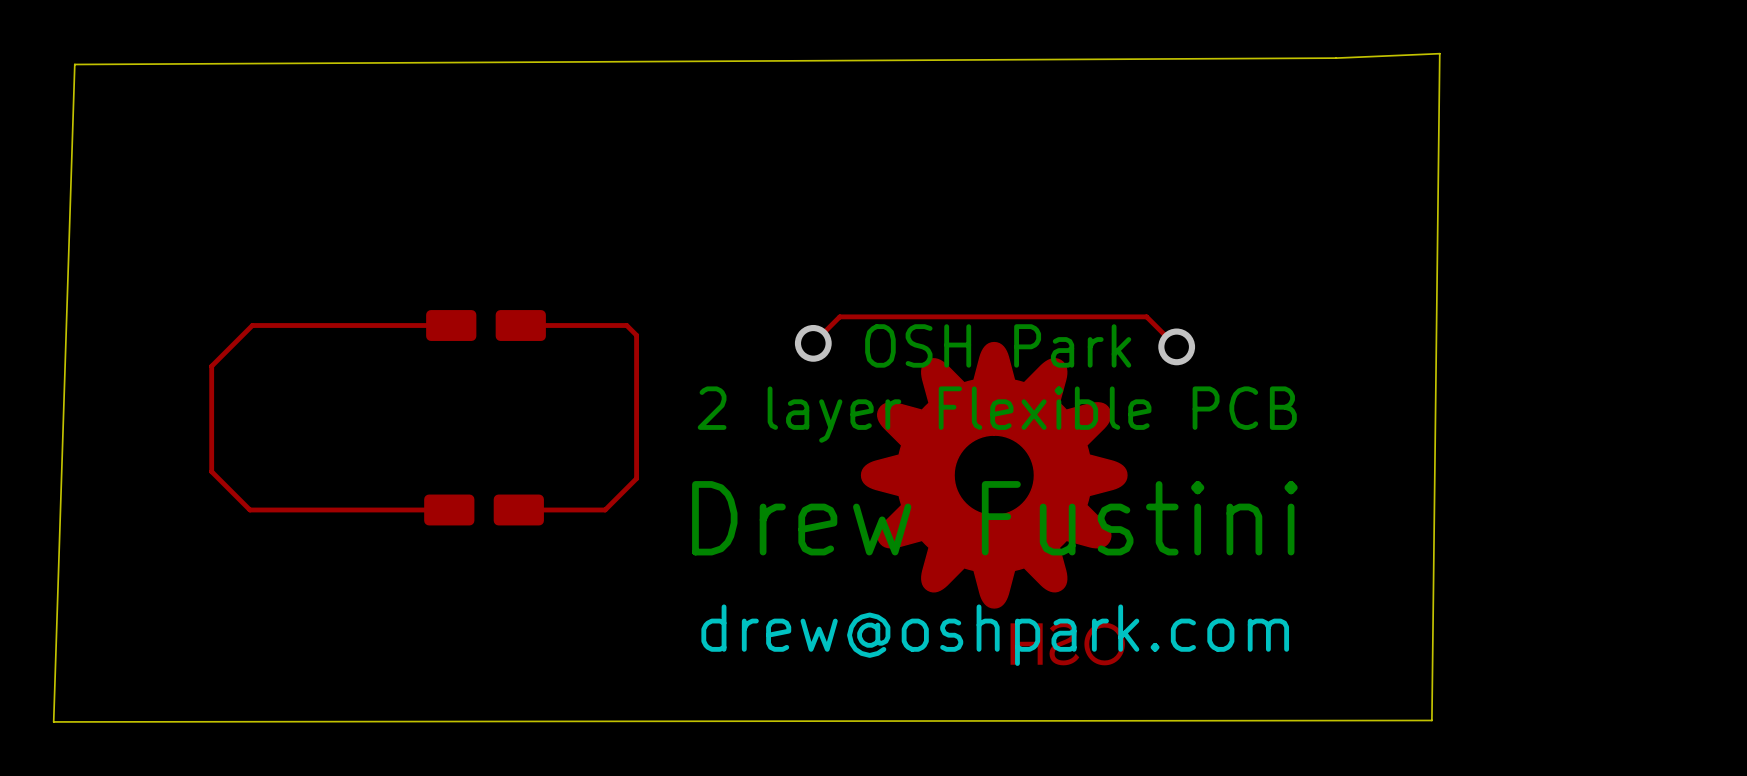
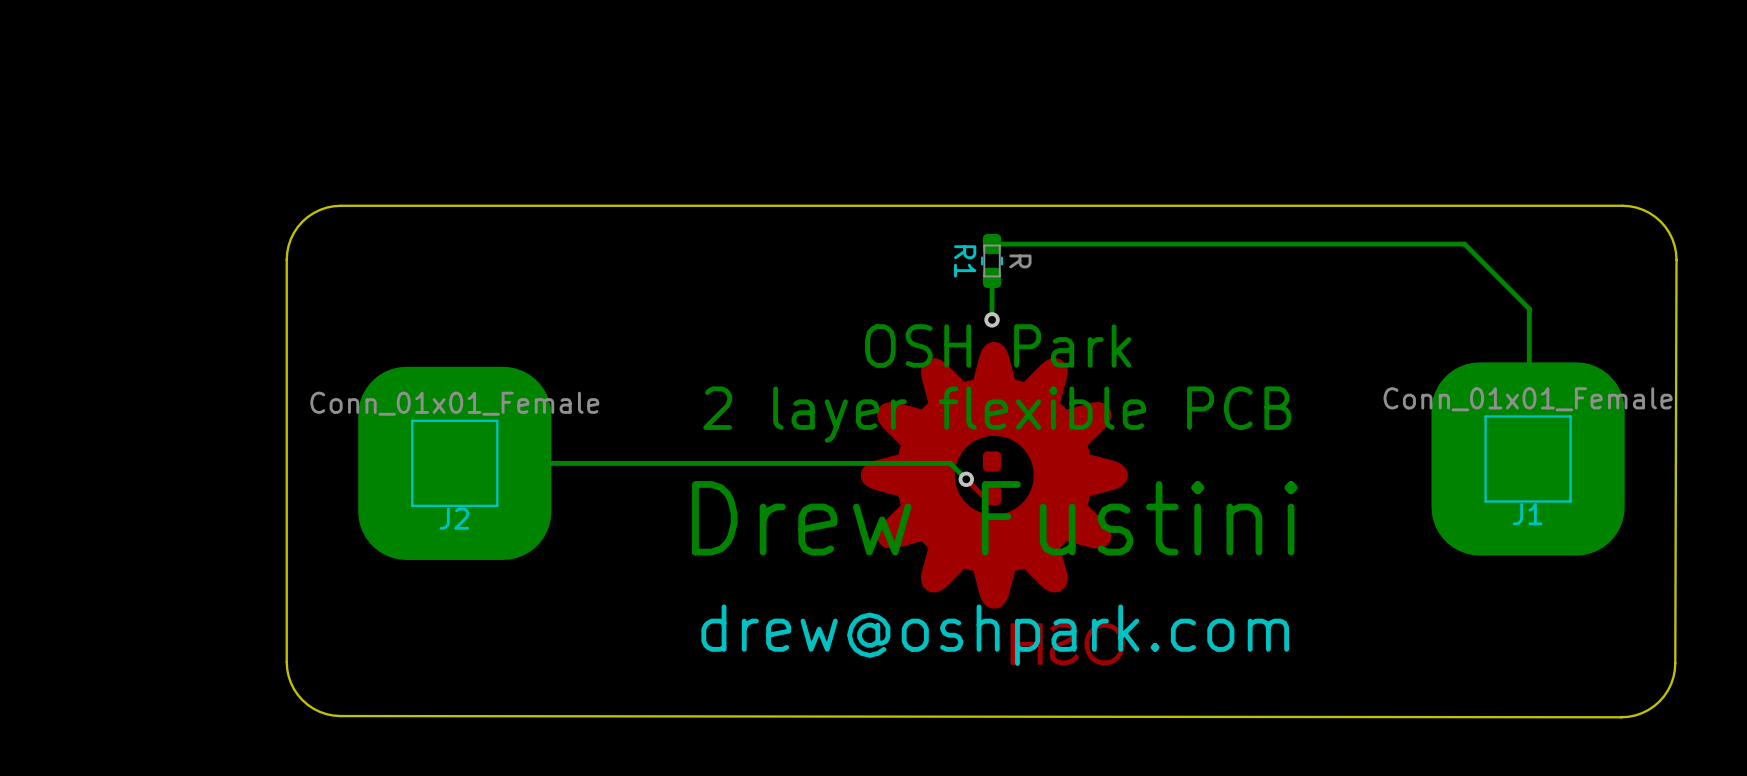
board edge: (1439, 53) (1336, 58) (74, 64) (53, 721) (1431, 720) (1439, 53) -> (1622, 205) (1643, 209) (1660, 221) (1672, 239) (1676, 259) (1674, 670) (1671, 683) (1664, 696) (1654, 706) (1641, 713) (1621, 717) (340, 716) (326, 714) (313, 708) (302, 700) (290, 682) (286, 662) (286, 259) (288, 245) (293, 232) (302, 221) (320, 209) (340, 205) (1622, 205)
bottom track: none -> (992, 244) (1464, 244) (1529, 308) (1529, 480)
R1: none -> R (992, 260)
bottom track: none -> (992, 277) (992, 319)
via: none -> (992, 319)
top track: (451, 325) (252, 325) (211, 366) (211, 471) (249, 509) (449, 509) -> none
part: (486, 325) -> none
top track: (520, 325) (626, 325) (636, 335) (636, 478) (605, 509) (518, 509) -> none
top track: (813, 343) (839, 316) (1146, 316) (1176, 346) -> none
via: (813, 343) -> none
via: (1176, 346) -> none
text: 2 layer Flexible PCB (997, 414) -> 2 layer flexible PCB (997, 414)
J1: none -> Conn_01x01_Female (1528, 458)
bottom track: none -> (443, 463) (950, 463) (966, 479)
J2: none -> Conn_01x01_Female (454, 463)
part: none -> (992, 478)
top track: none -> (966, 479) (982, 495) (992, 495)
via: none -> (966, 479)
part: (484, 509) -> none

